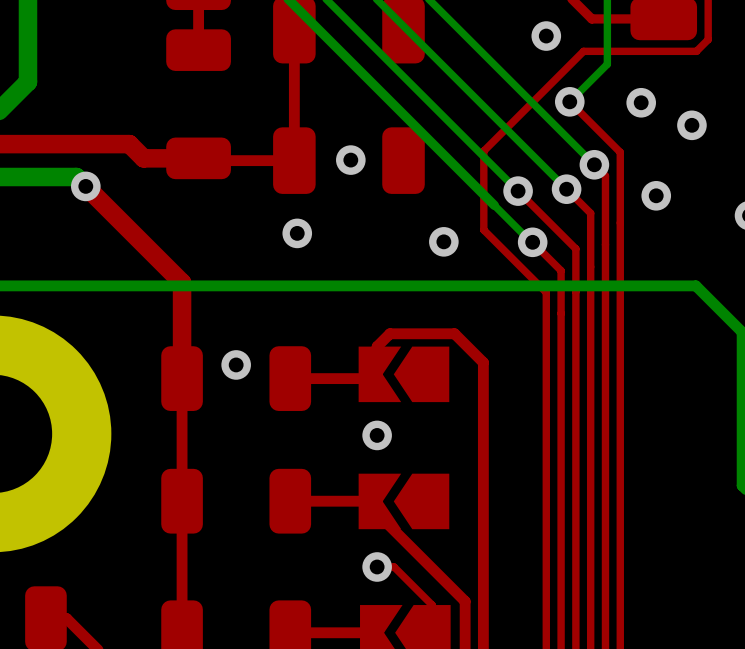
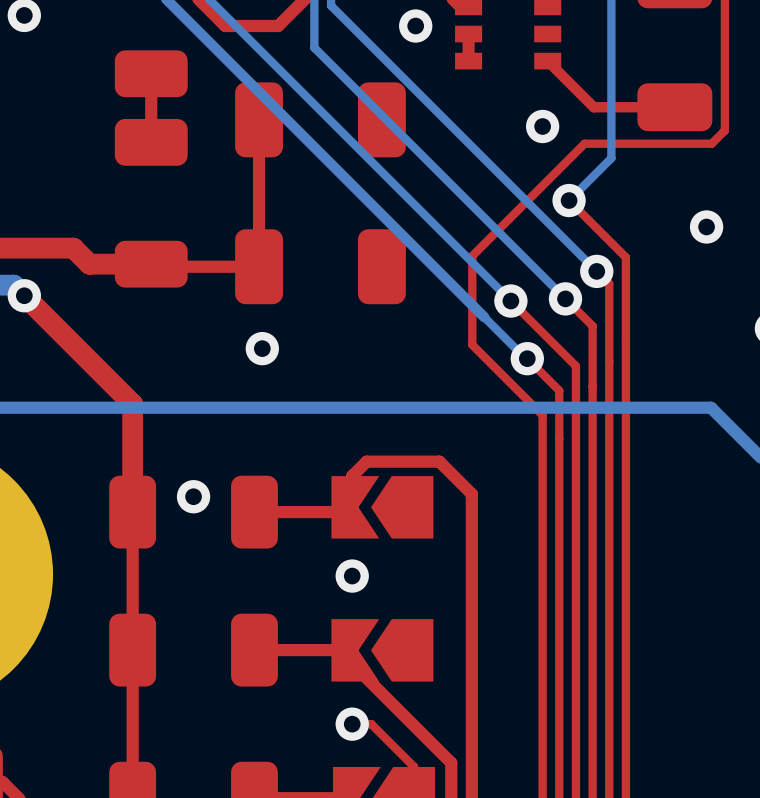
via: (641, 102) -> none
via: (350, 160) -> none
via: (656, 195) -> none
via: (443, 241) -> none

